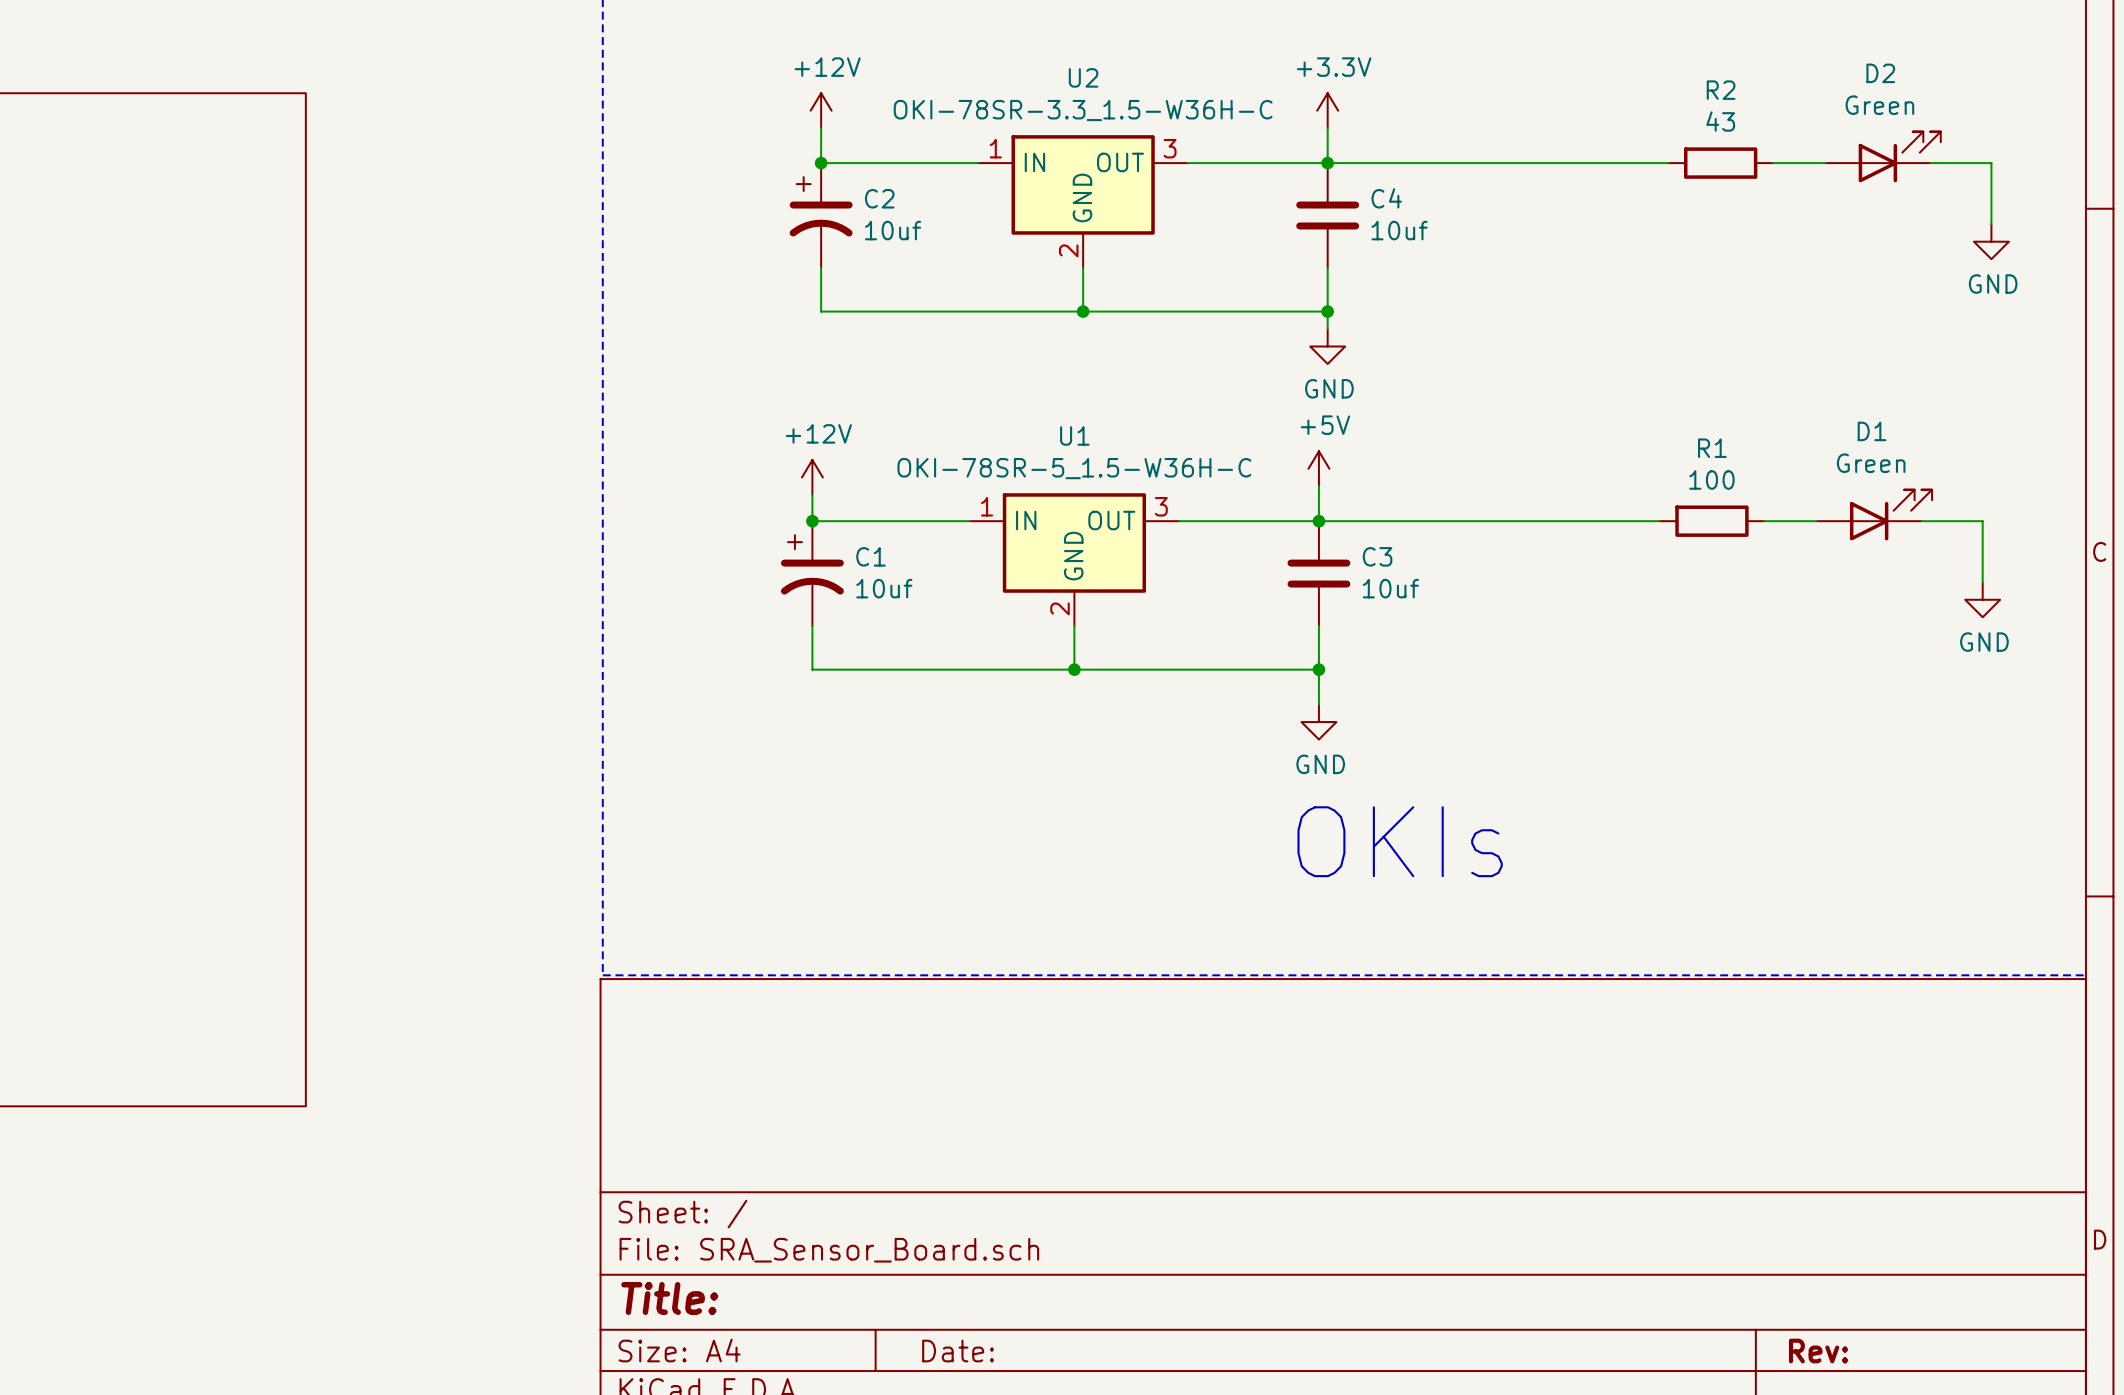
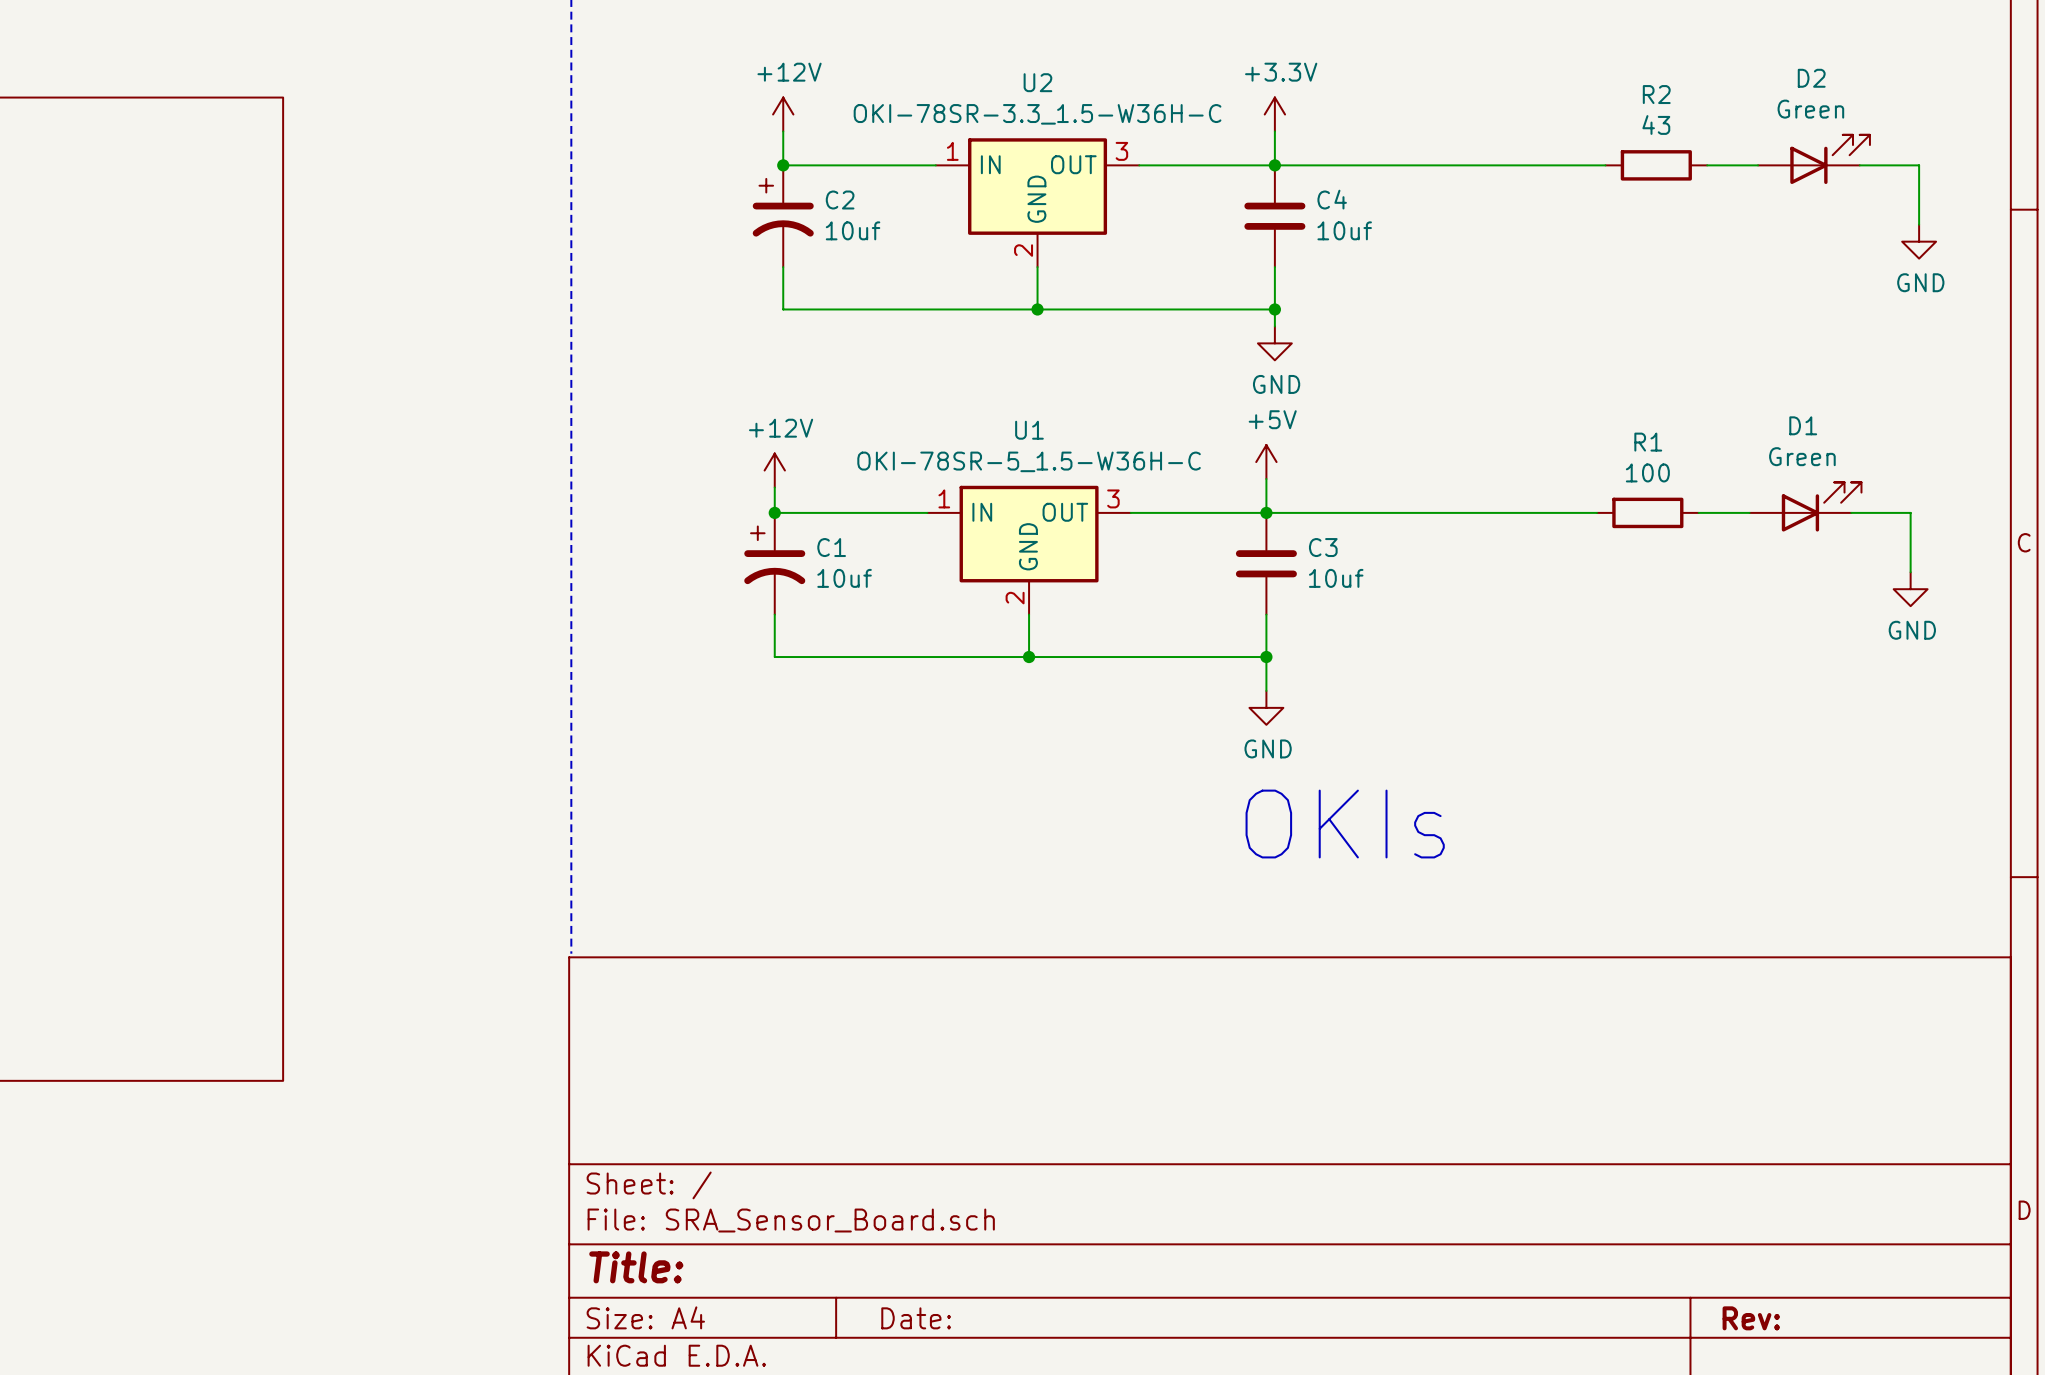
line: (602, 975) (2087, 975) -> none

